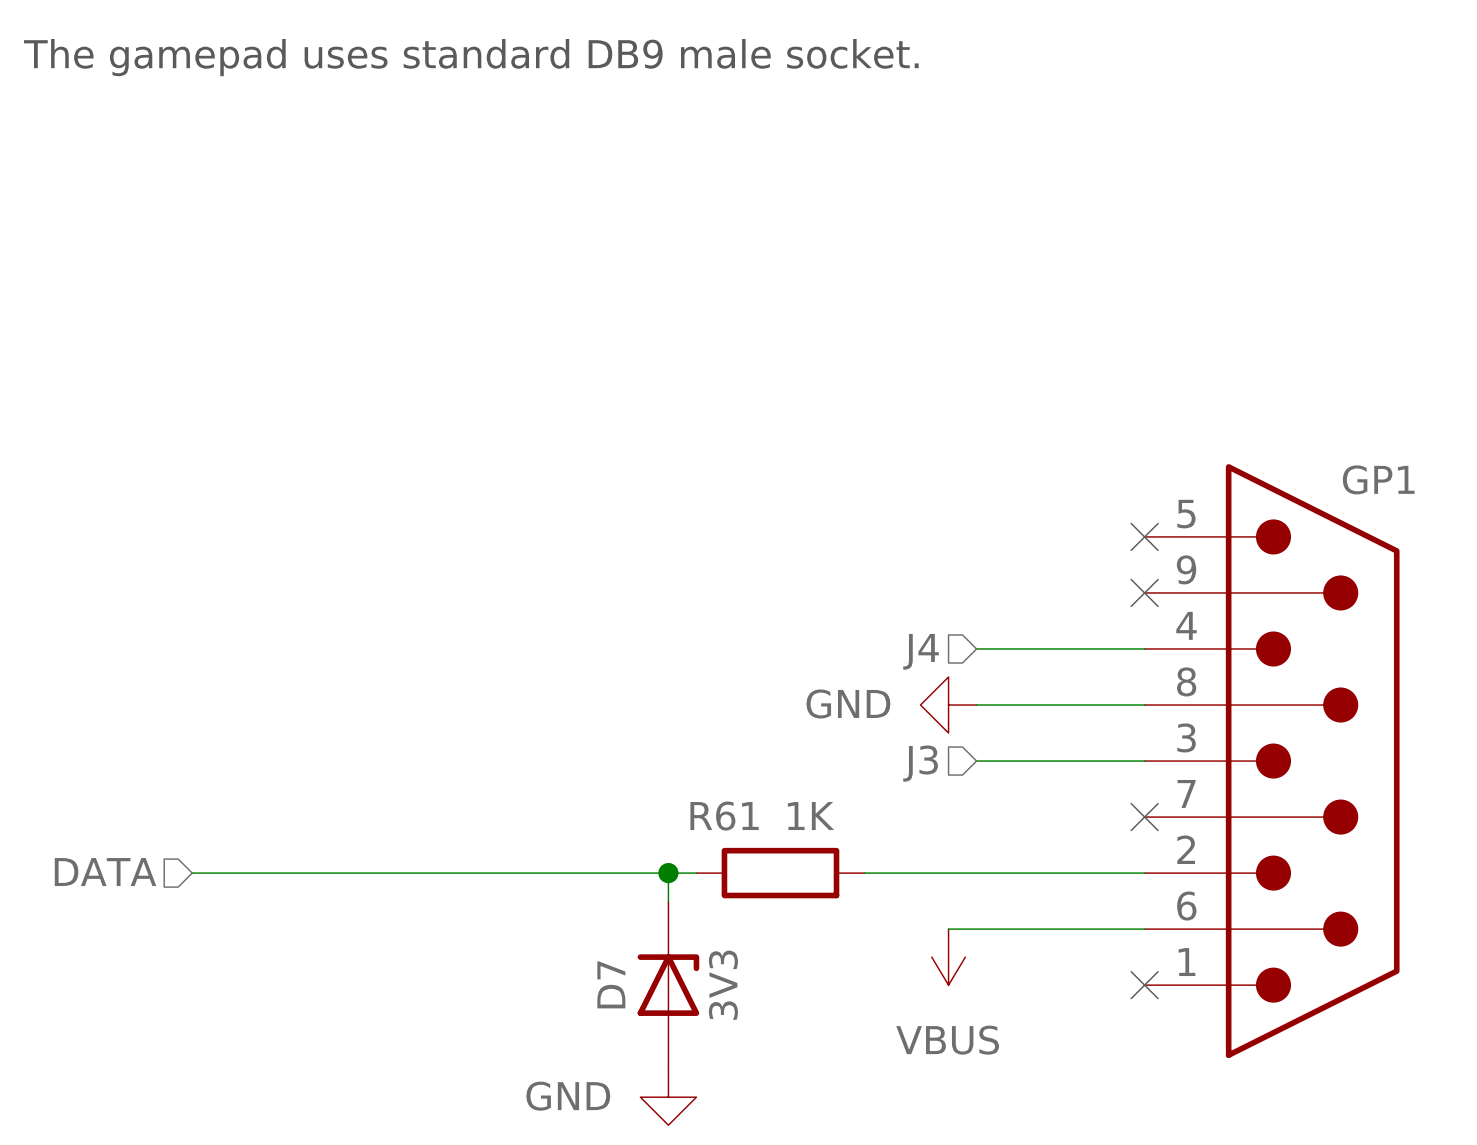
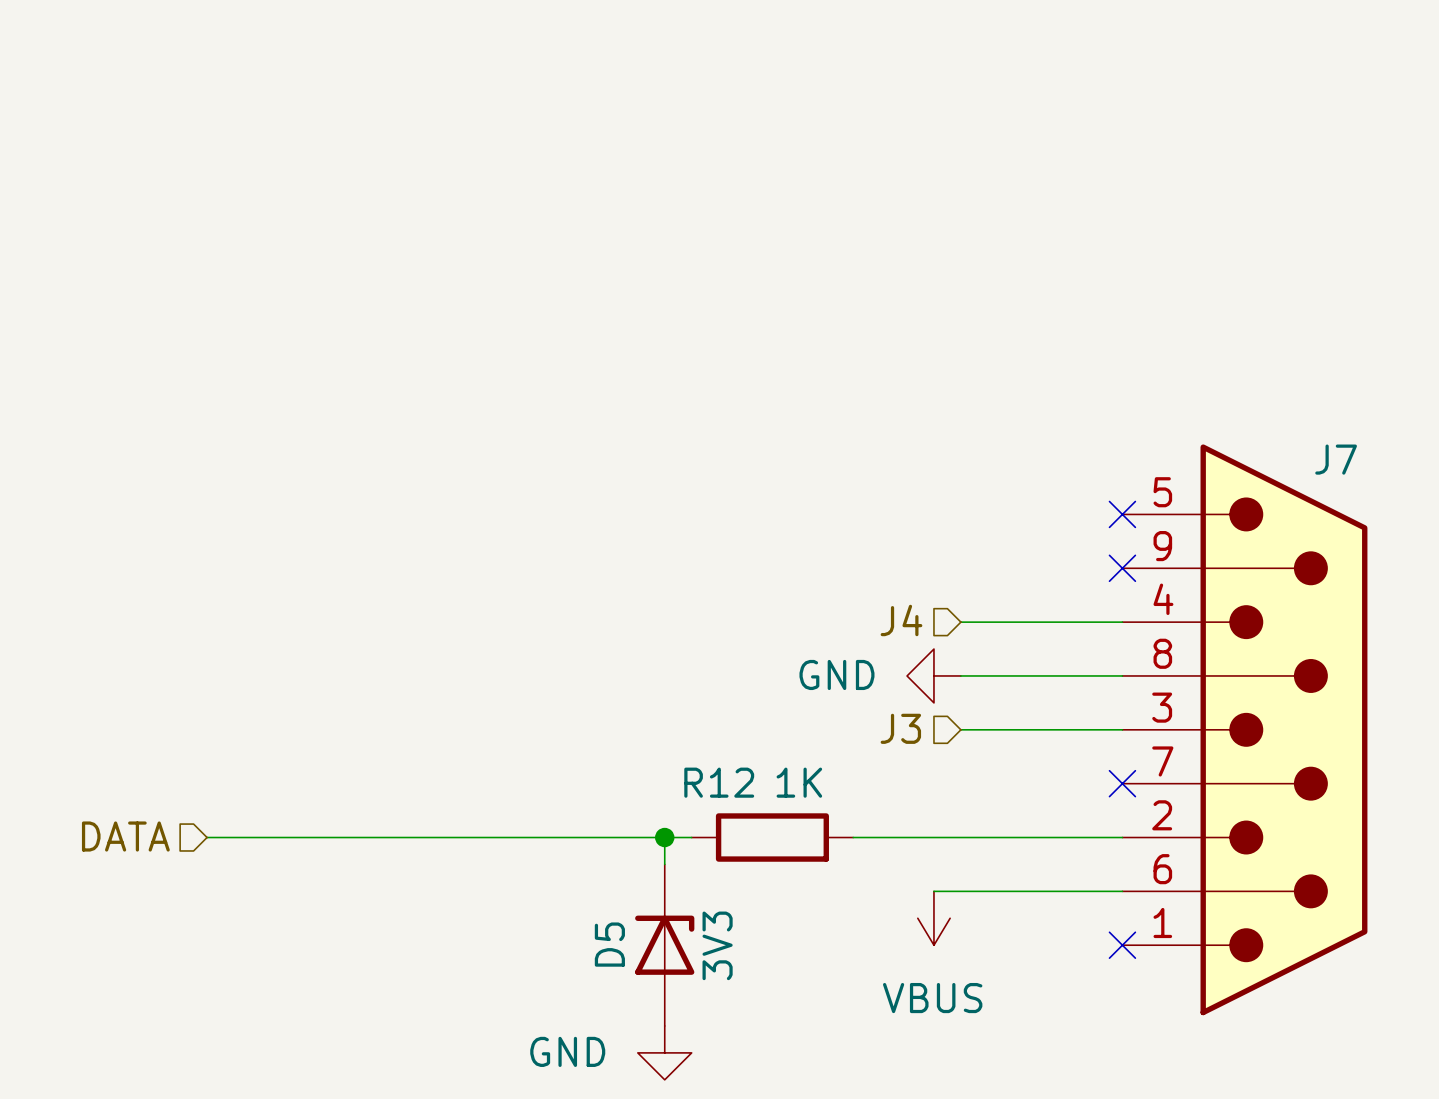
text: The gamepad uses standard DB9 male socket. (471, 57) -> none
GP1 name: GP1 (1378, 479) -> J7 (1336, 459)
R61 name: R61 (724, 816) -> R12 (719, 782)
D7 name: D7 (611, 984) -> D5 (609, 944)

